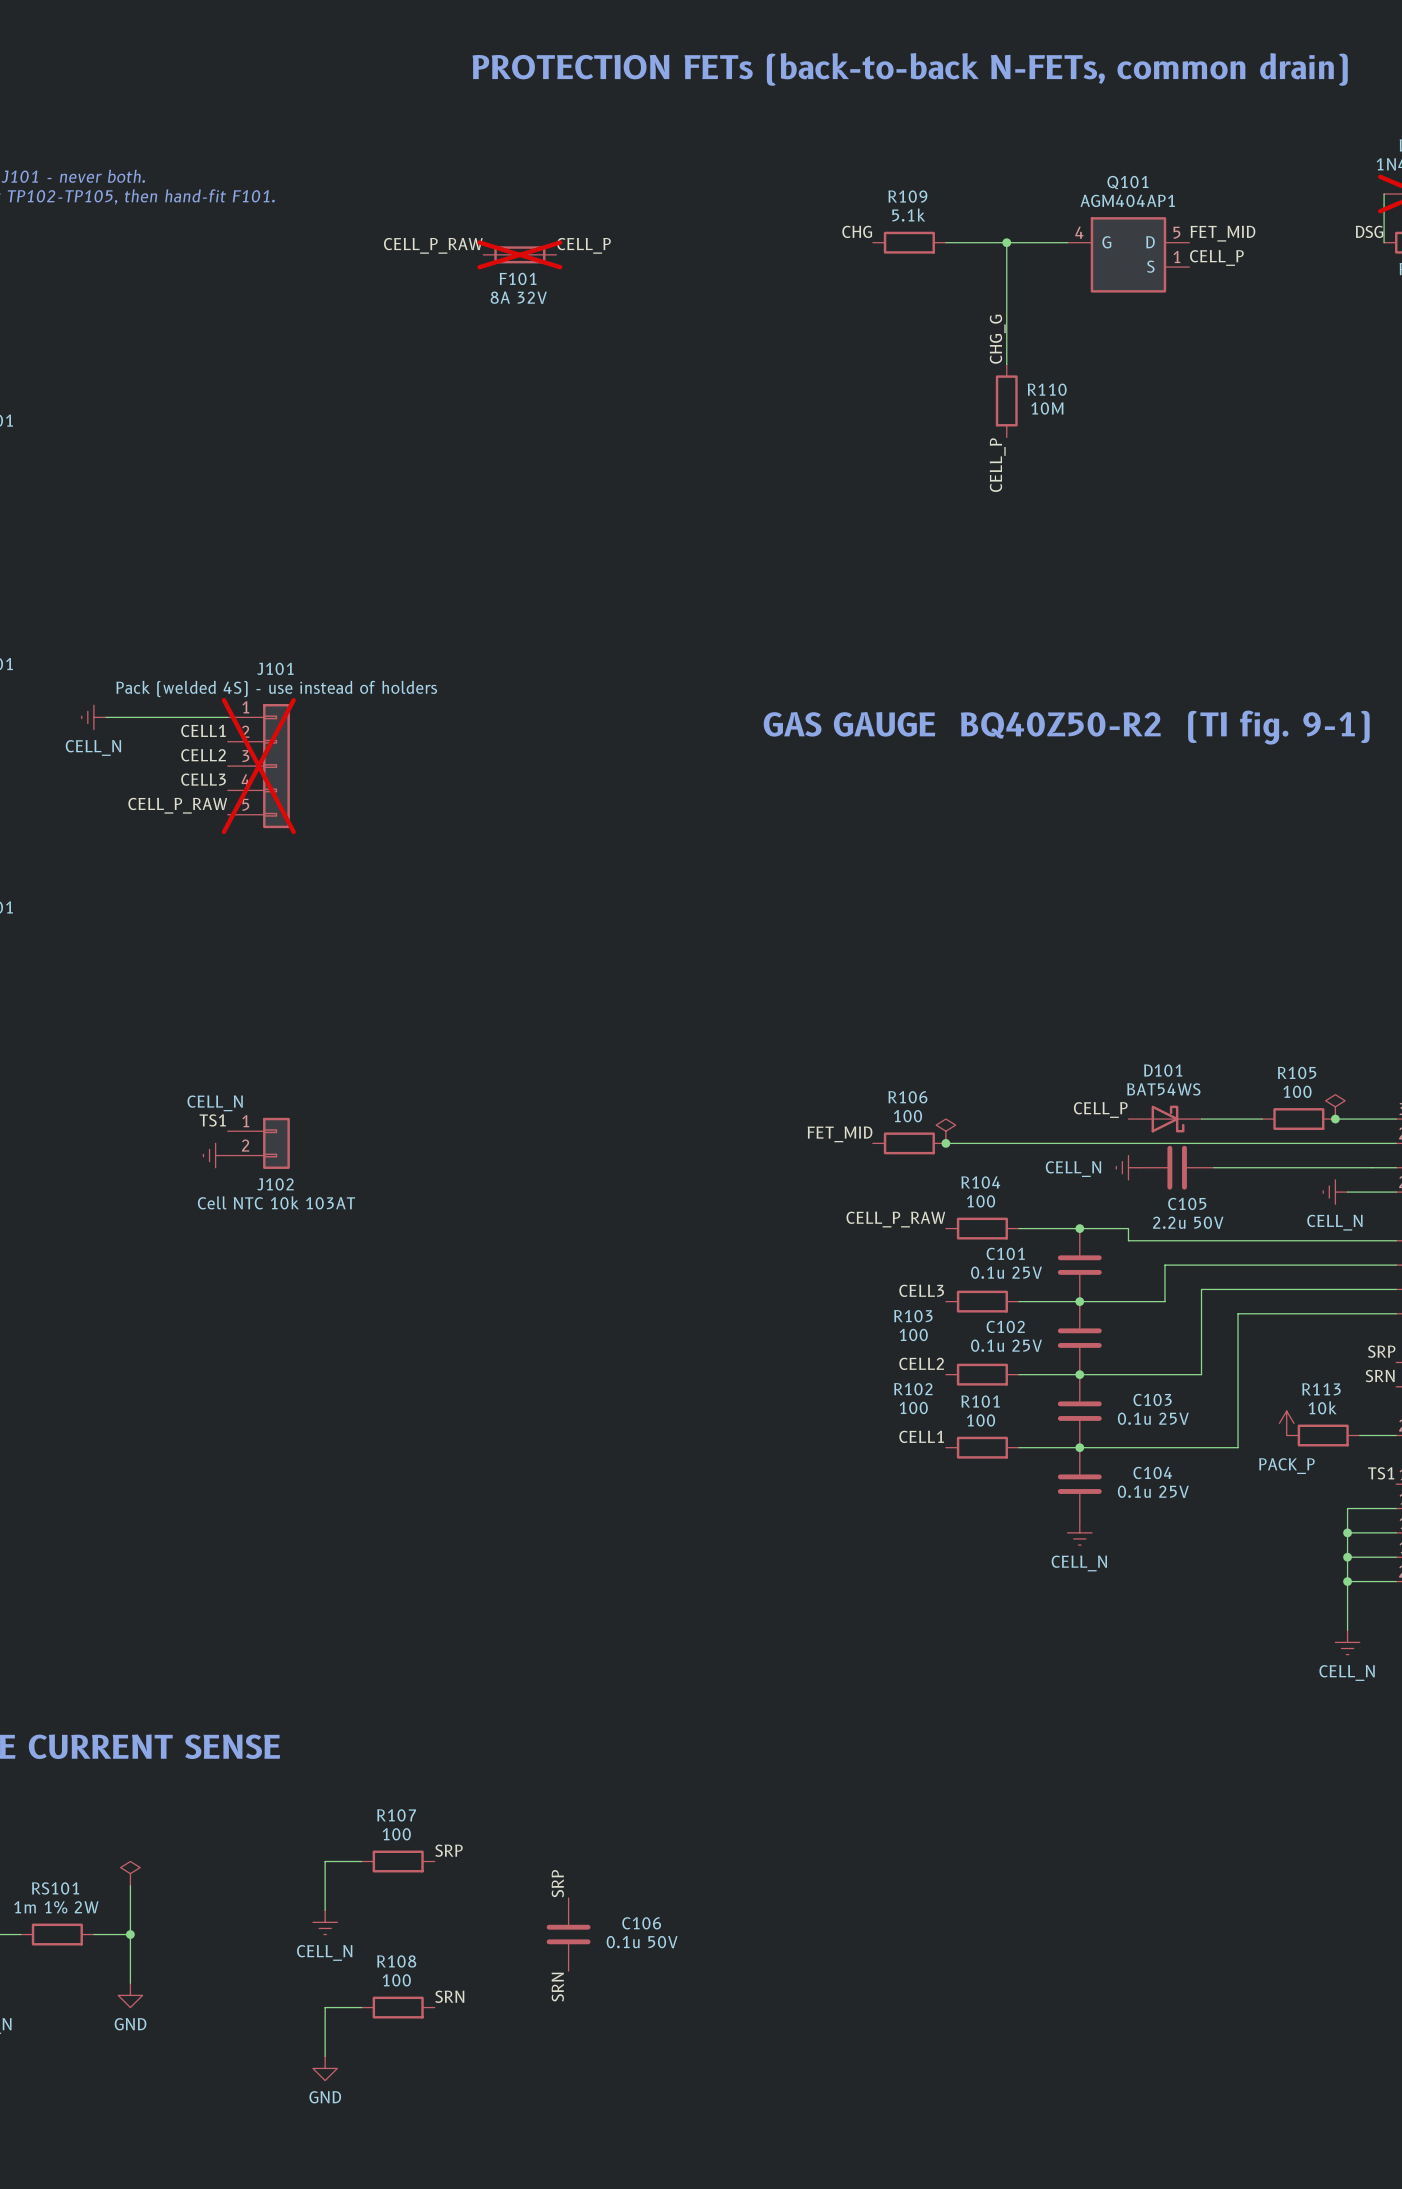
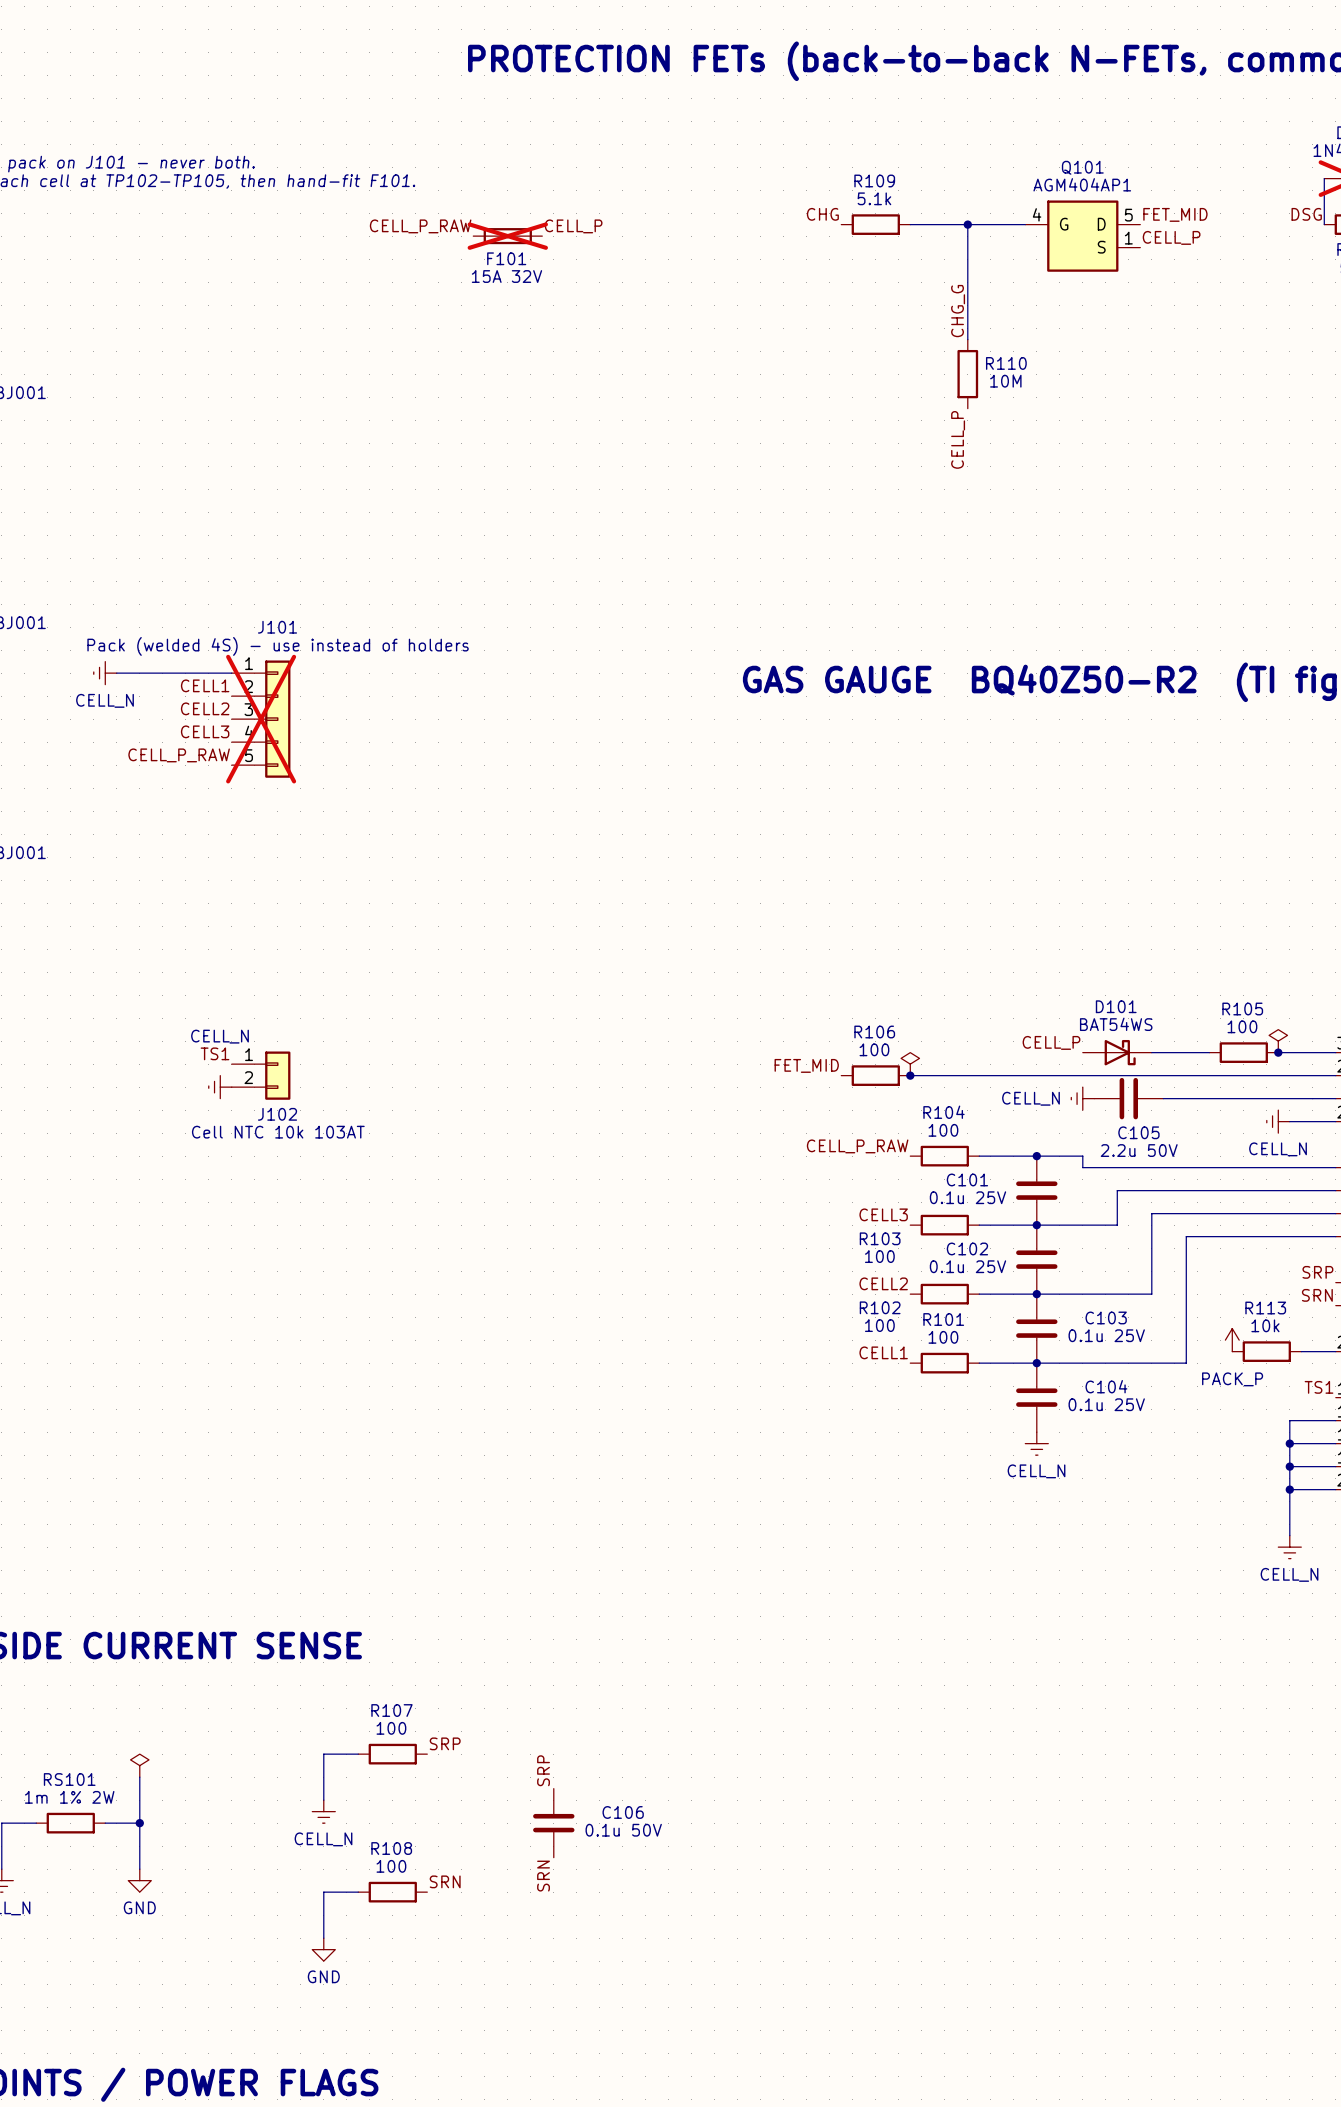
F101 value: 8A 32V (518, 297) -> 15A 32V (506, 276)

